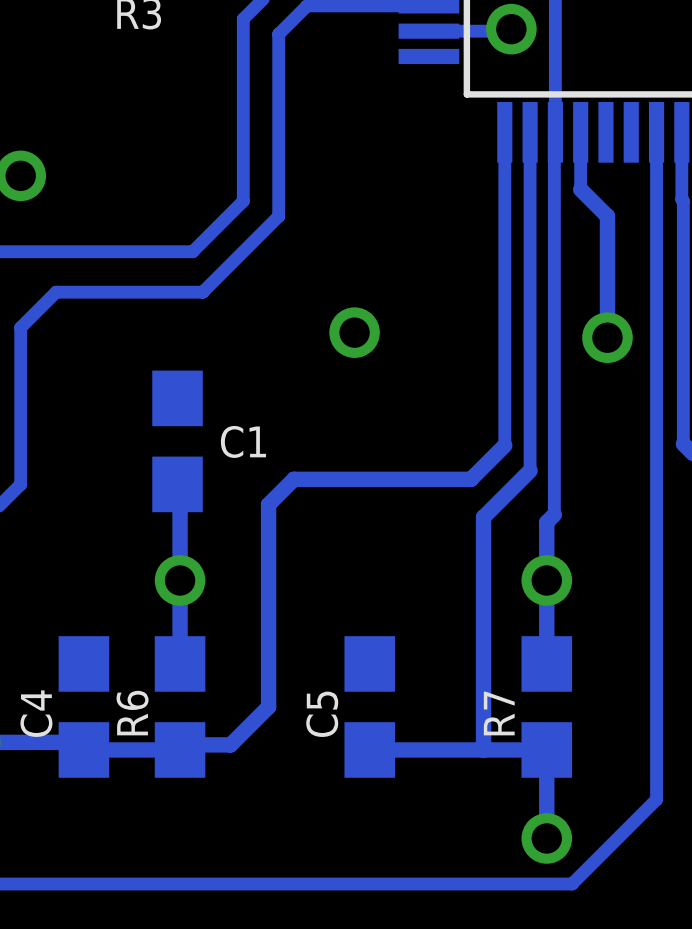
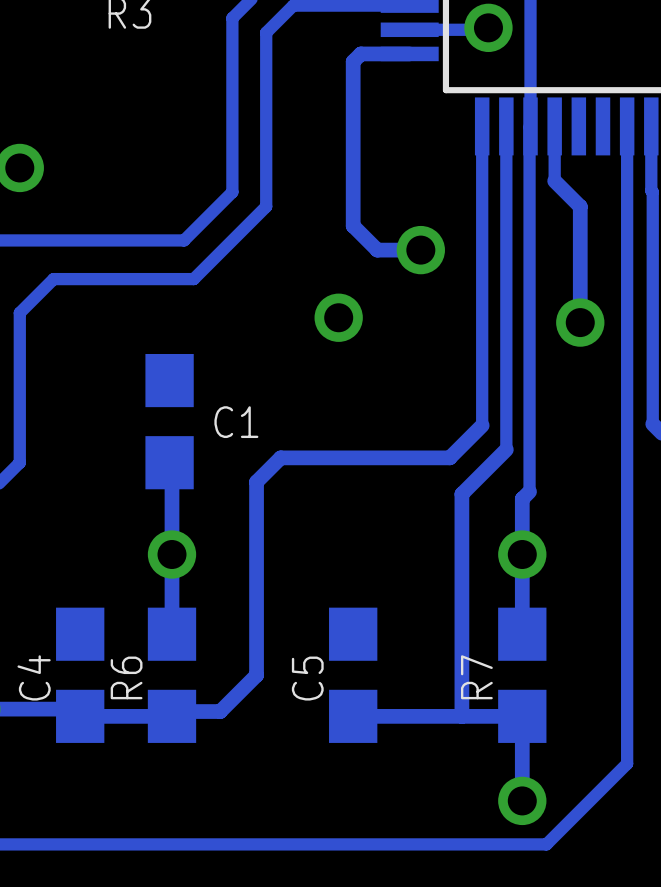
track: none -> (409, 53) (360, 53) (353, 61) (353, 225) (377, 250) (420, 250)
via: none -> (420, 250)

